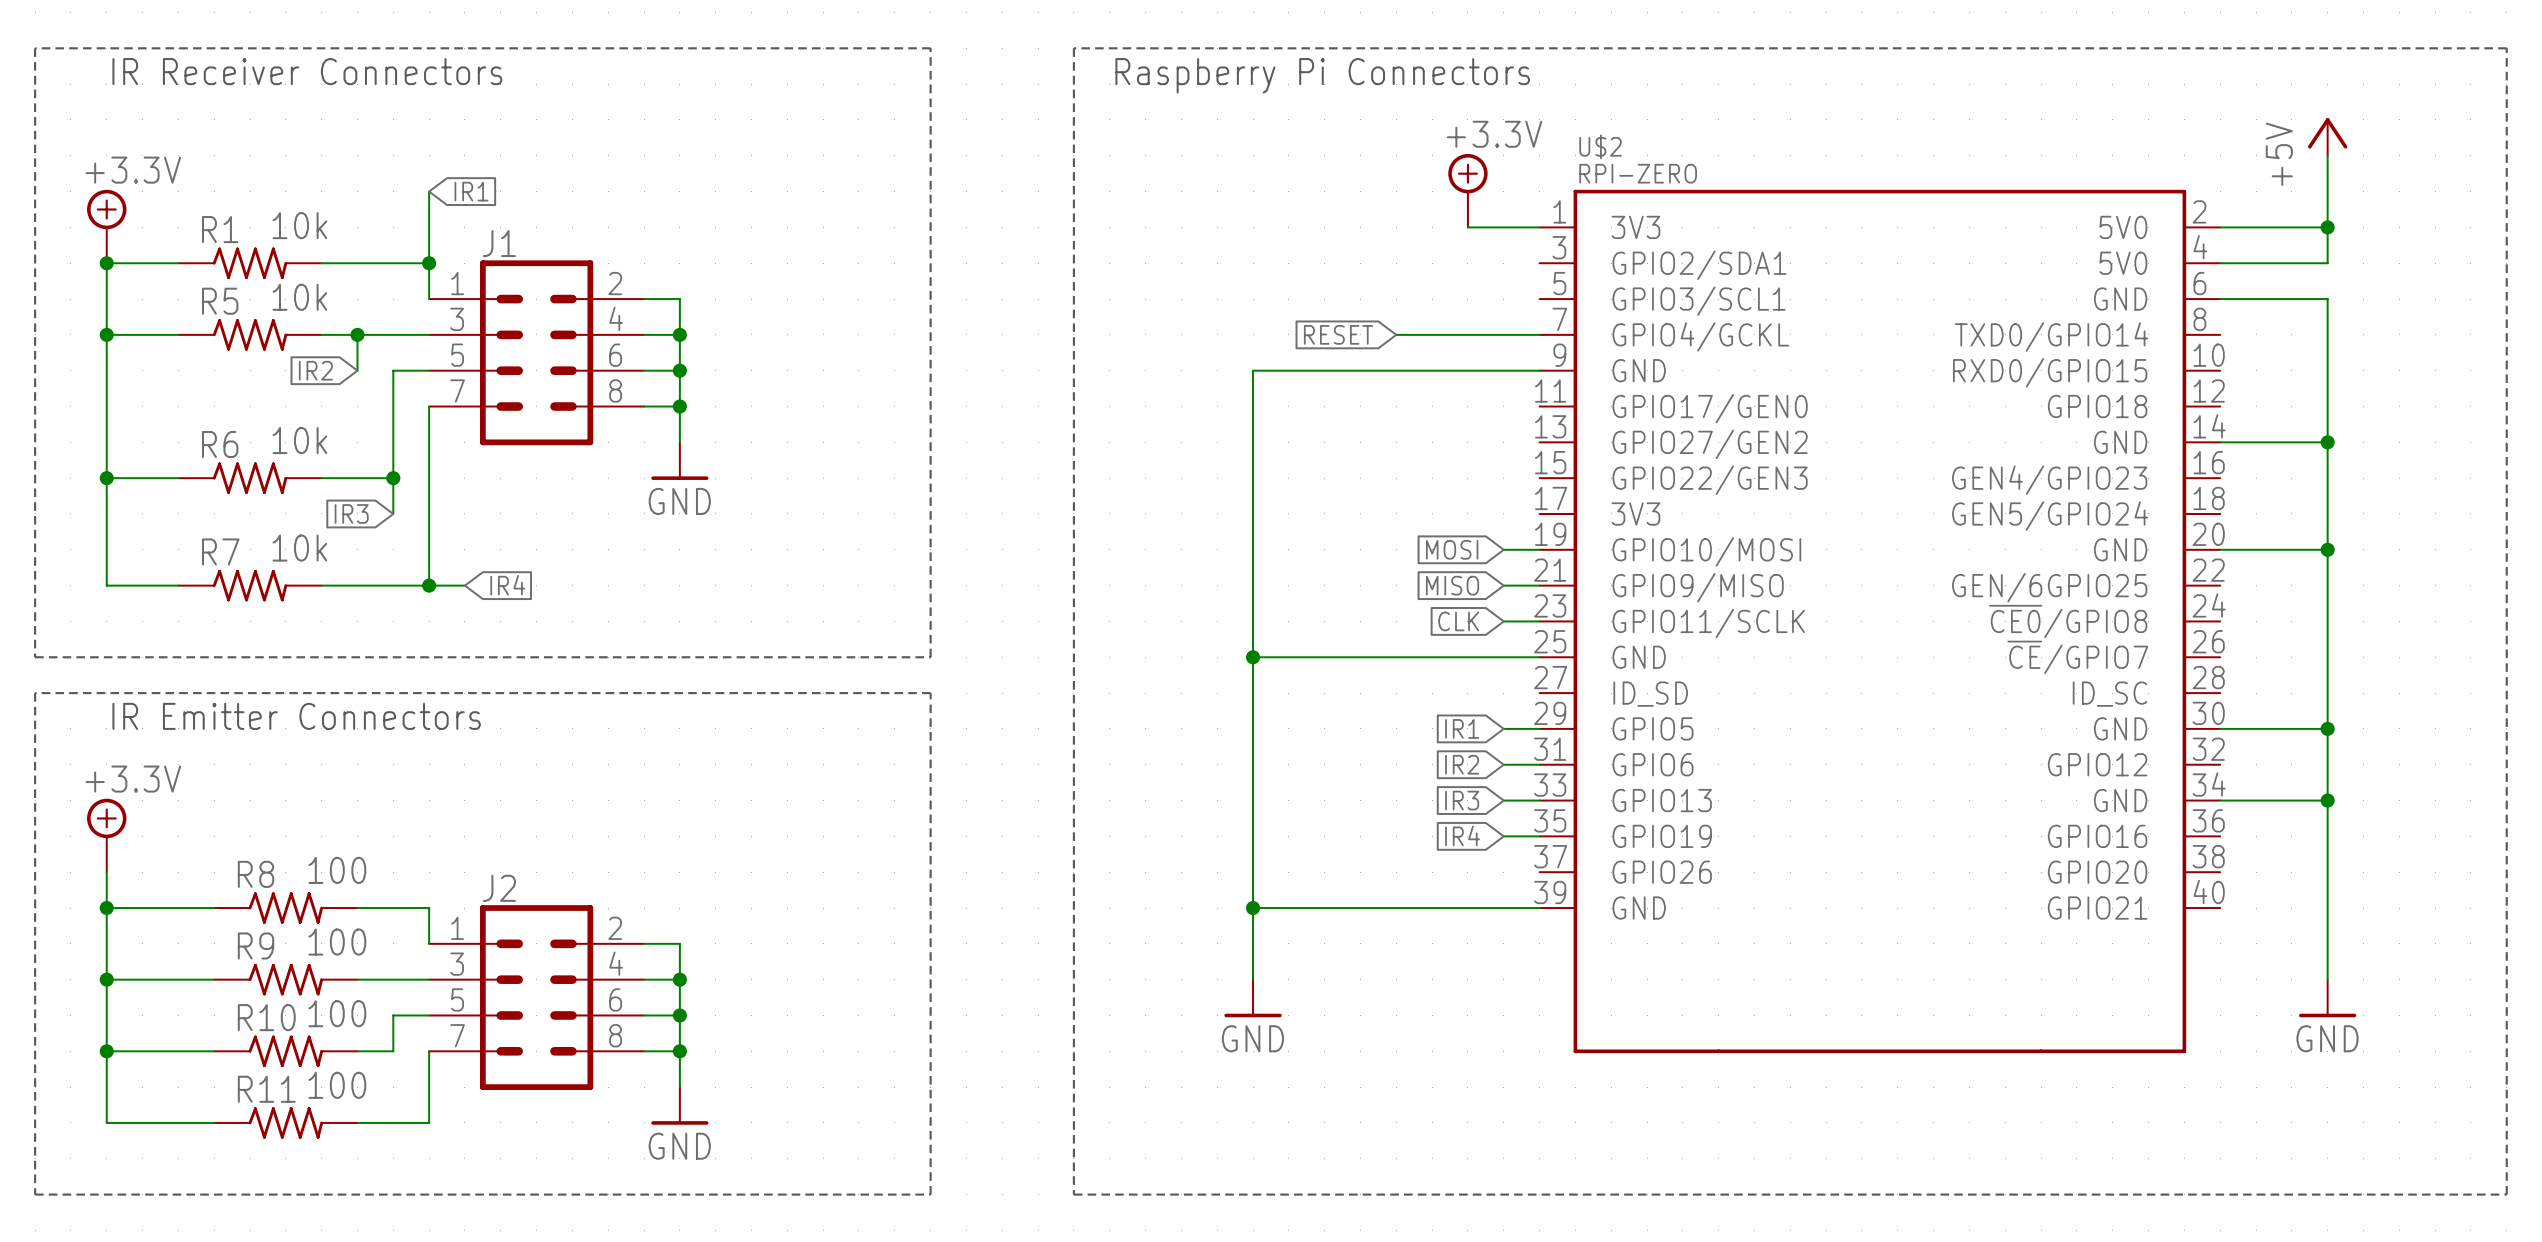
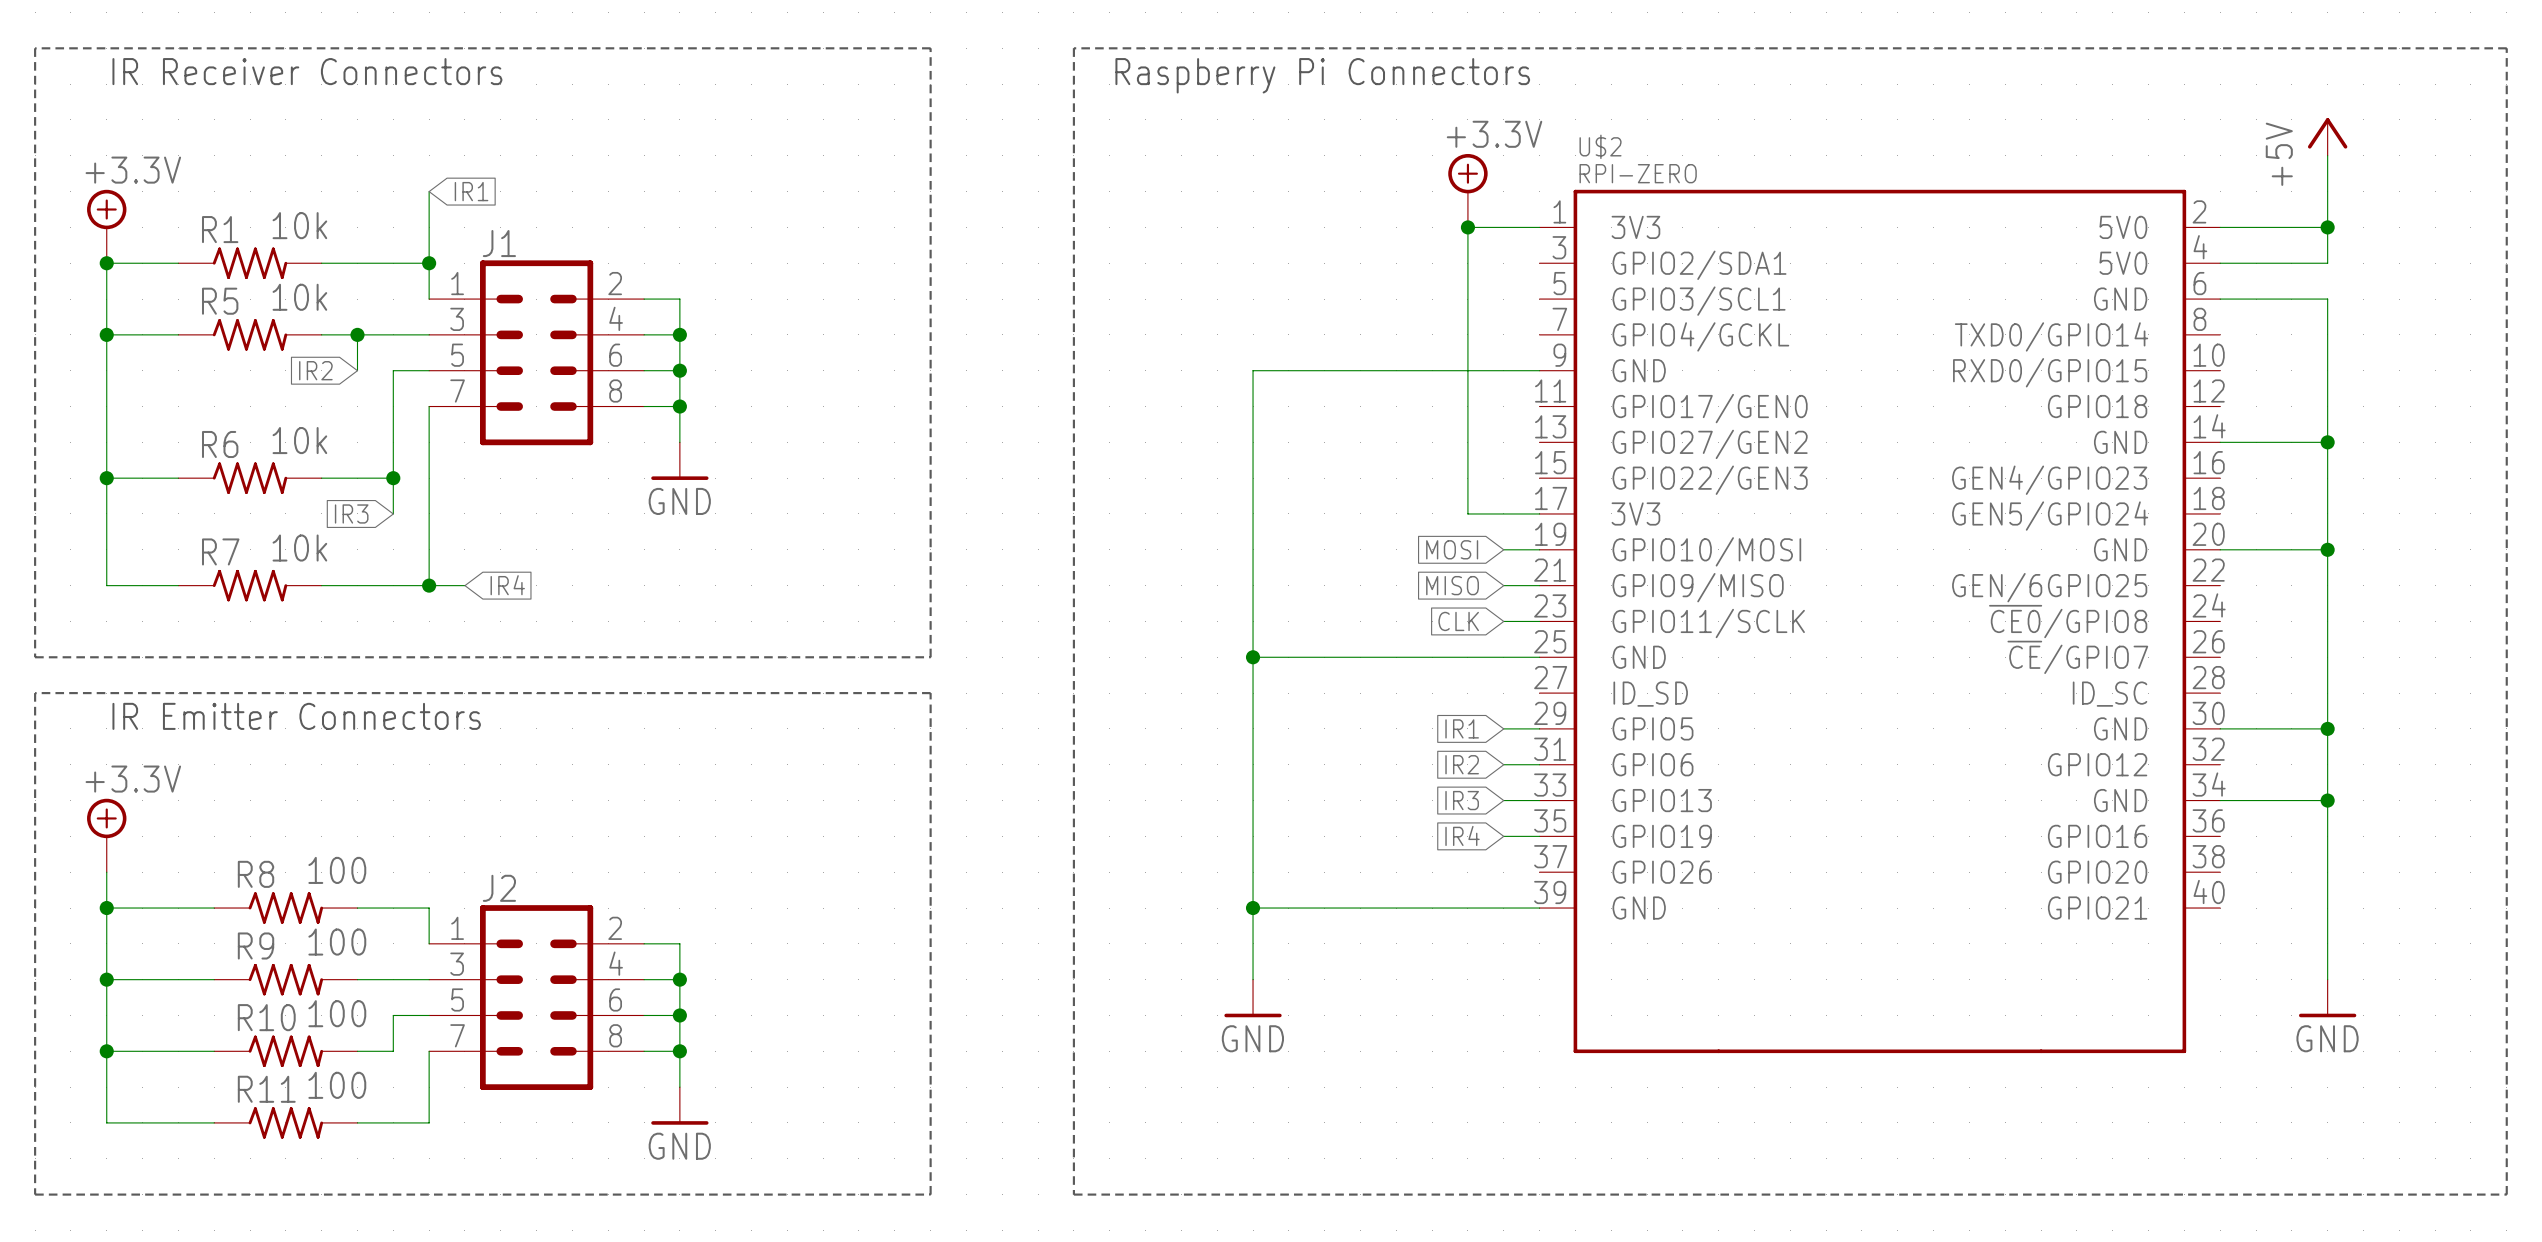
wire: none -> (1467, 227) (1467, 513) (1539, 513)
junction: none -> (1467, 227)
global label: RESET (1338, 334) -> none
wire: (1396, 334) (1539, 334) -> none

